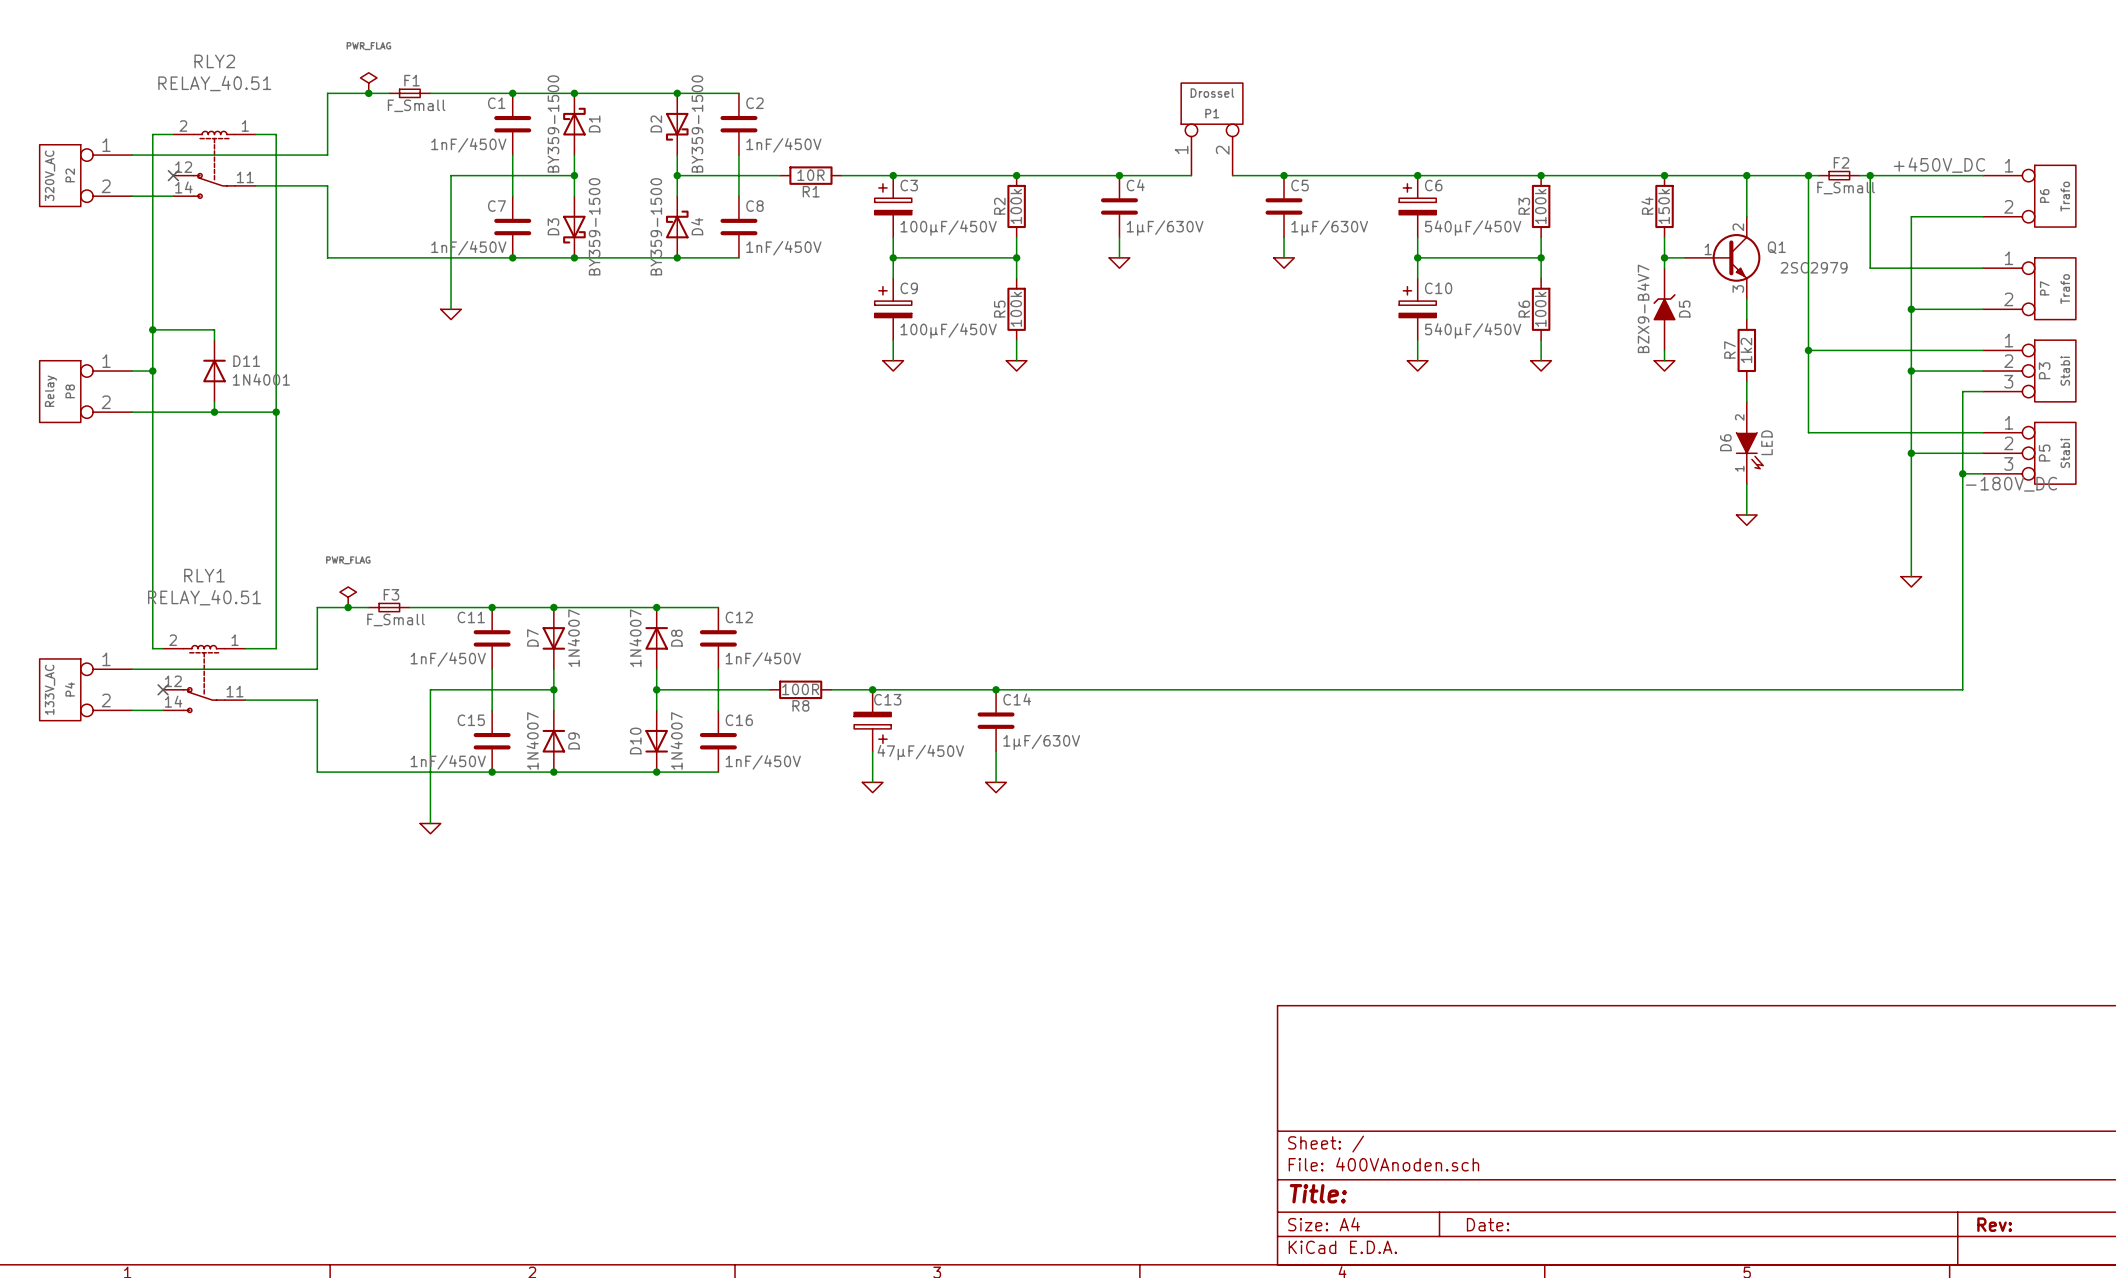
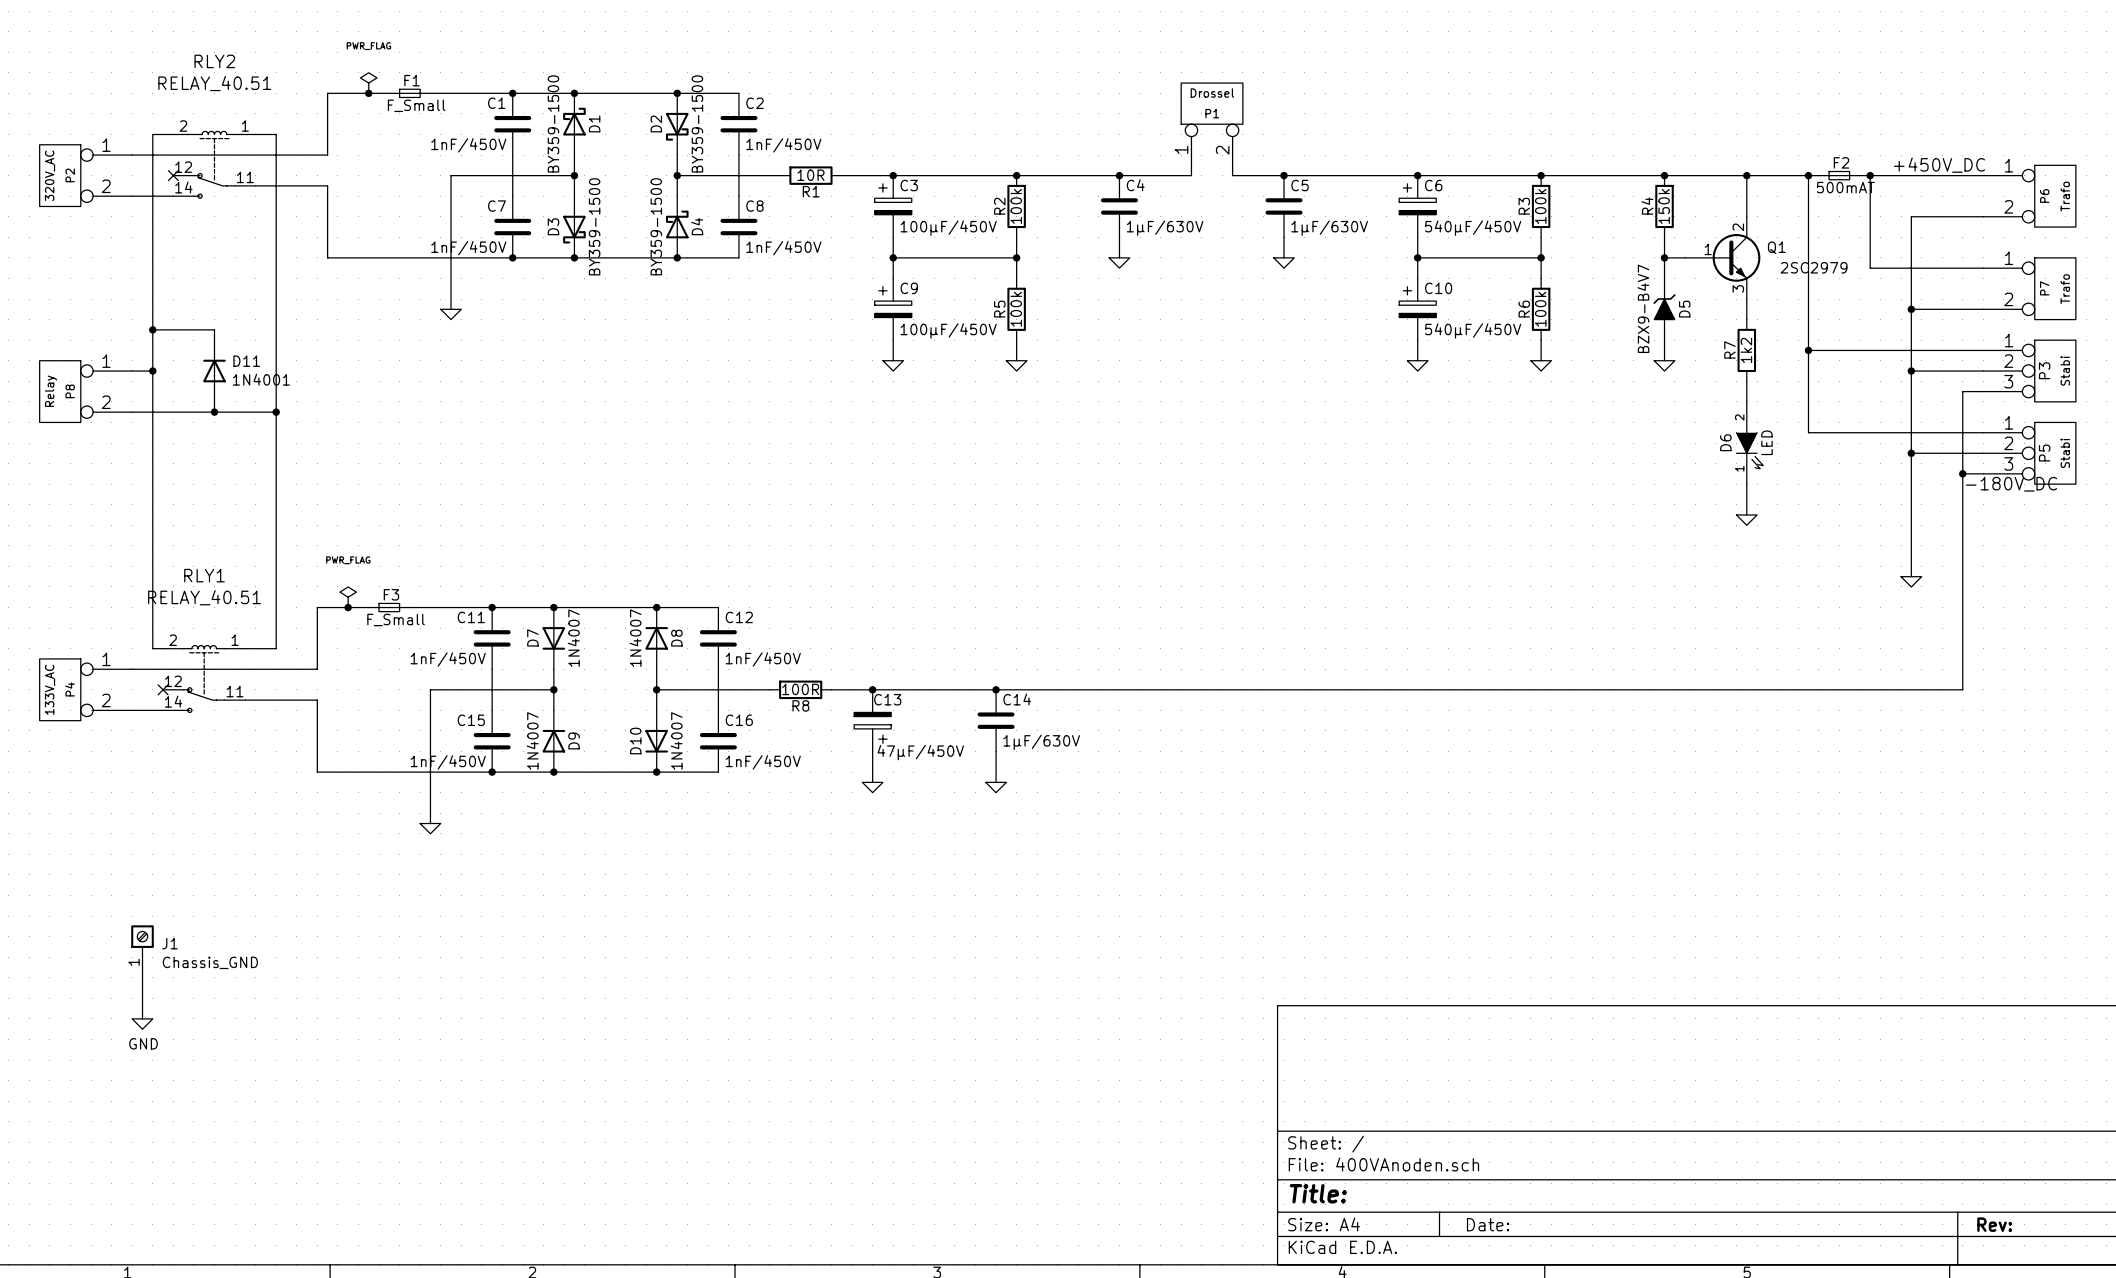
F2 value: F_Small (1846, 188) -> 500mAT (1845, 187)
J1: none -> Chassis_GND (142, 951)
wire: none -> (142, 977) (142, 1008)
power symbol: none -> GND (142, 1018)

